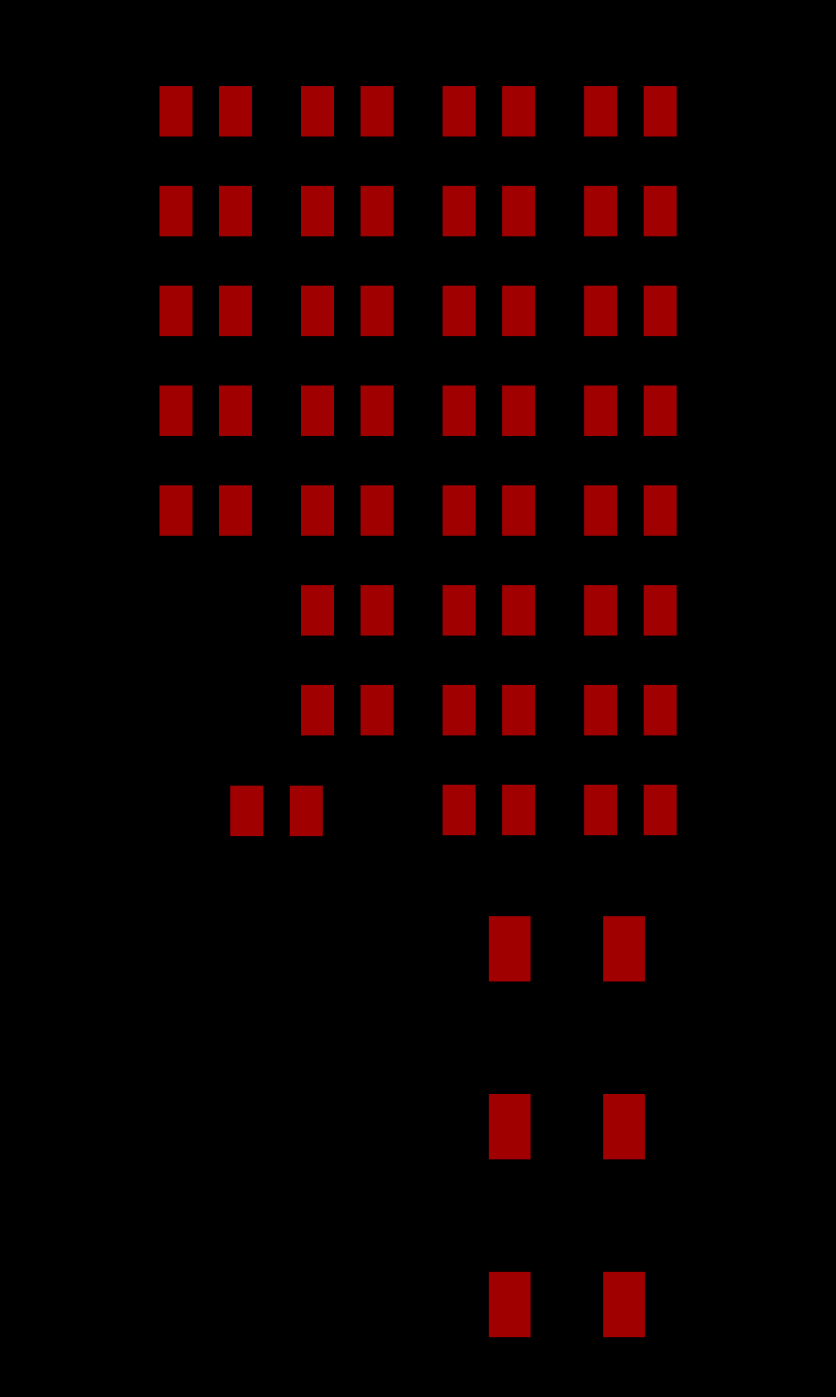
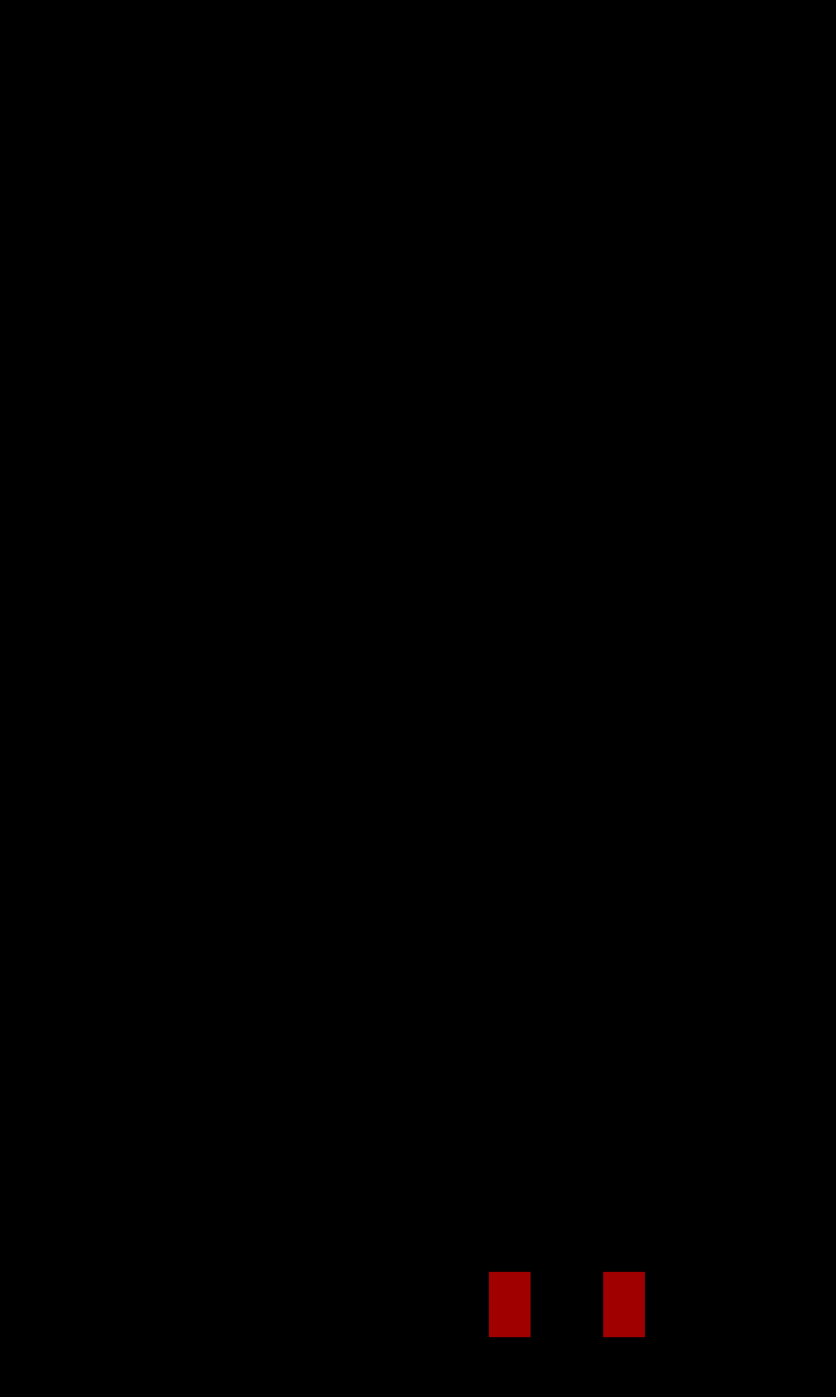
part: (205, 111) -> none
part: (347, 111) -> none
part: (488, 111) -> none
part: (630, 111) -> none
part: (205, 211) -> none
part: (347, 211) -> none
part: (488, 211) -> none
part: (630, 211) -> none
part: (205, 310) -> none
part: (347, 310) -> none
part: (488, 310) -> none
part: (630, 310) -> none
part: (205, 410) -> none
part: (347, 410) -> none
part: (488, 410) -> none
part: (630, 410) -> none
part: (205, 510) -> none
part: (347, 510) -> none
part: (488, 510) -> none
part: (630, 510) -> none
part: (347, 610) -> none
part: (488, 610) -> none
part: (630, 610) -> none
part: (347, 710) -> none
part: (488, 710) -> none
part: (630, 710) -> none
part: (488, 809) -> none
part: (630, 809) -> none
part: (276, 810) -> none
part: (566, 948) -> none
part: (566, 1126) -> none

